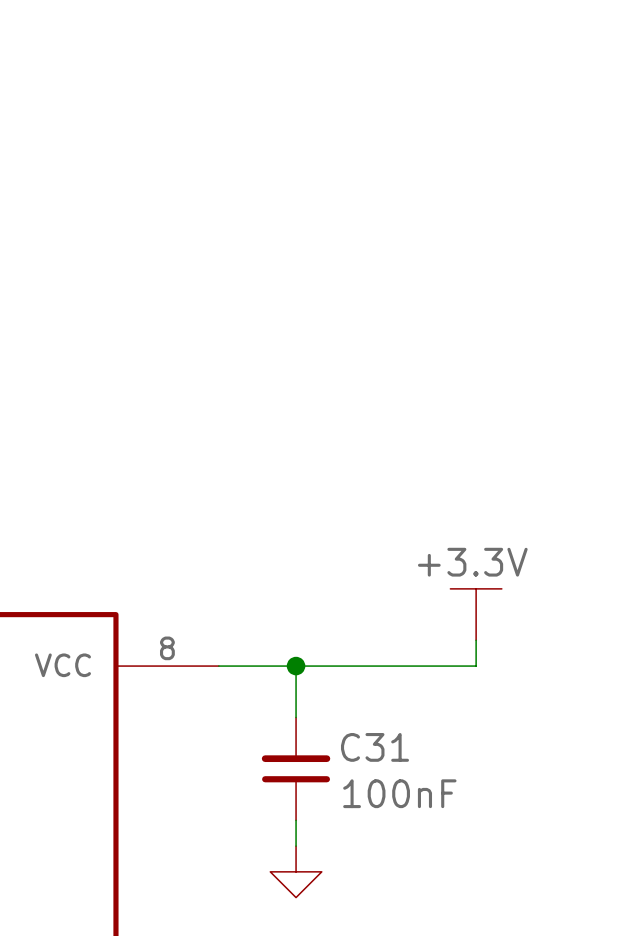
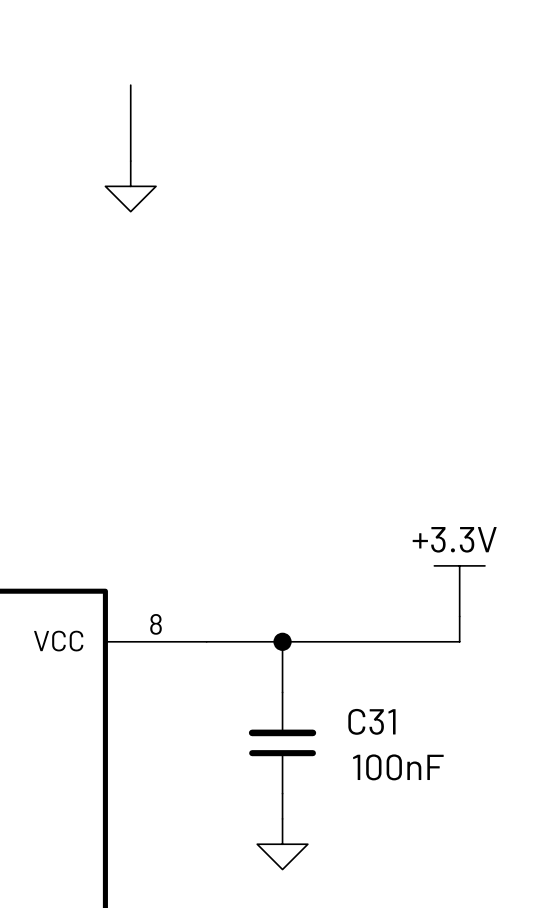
wire: none -> (130, 85) (130, 161)
power symbol: none -> (130, 186)

